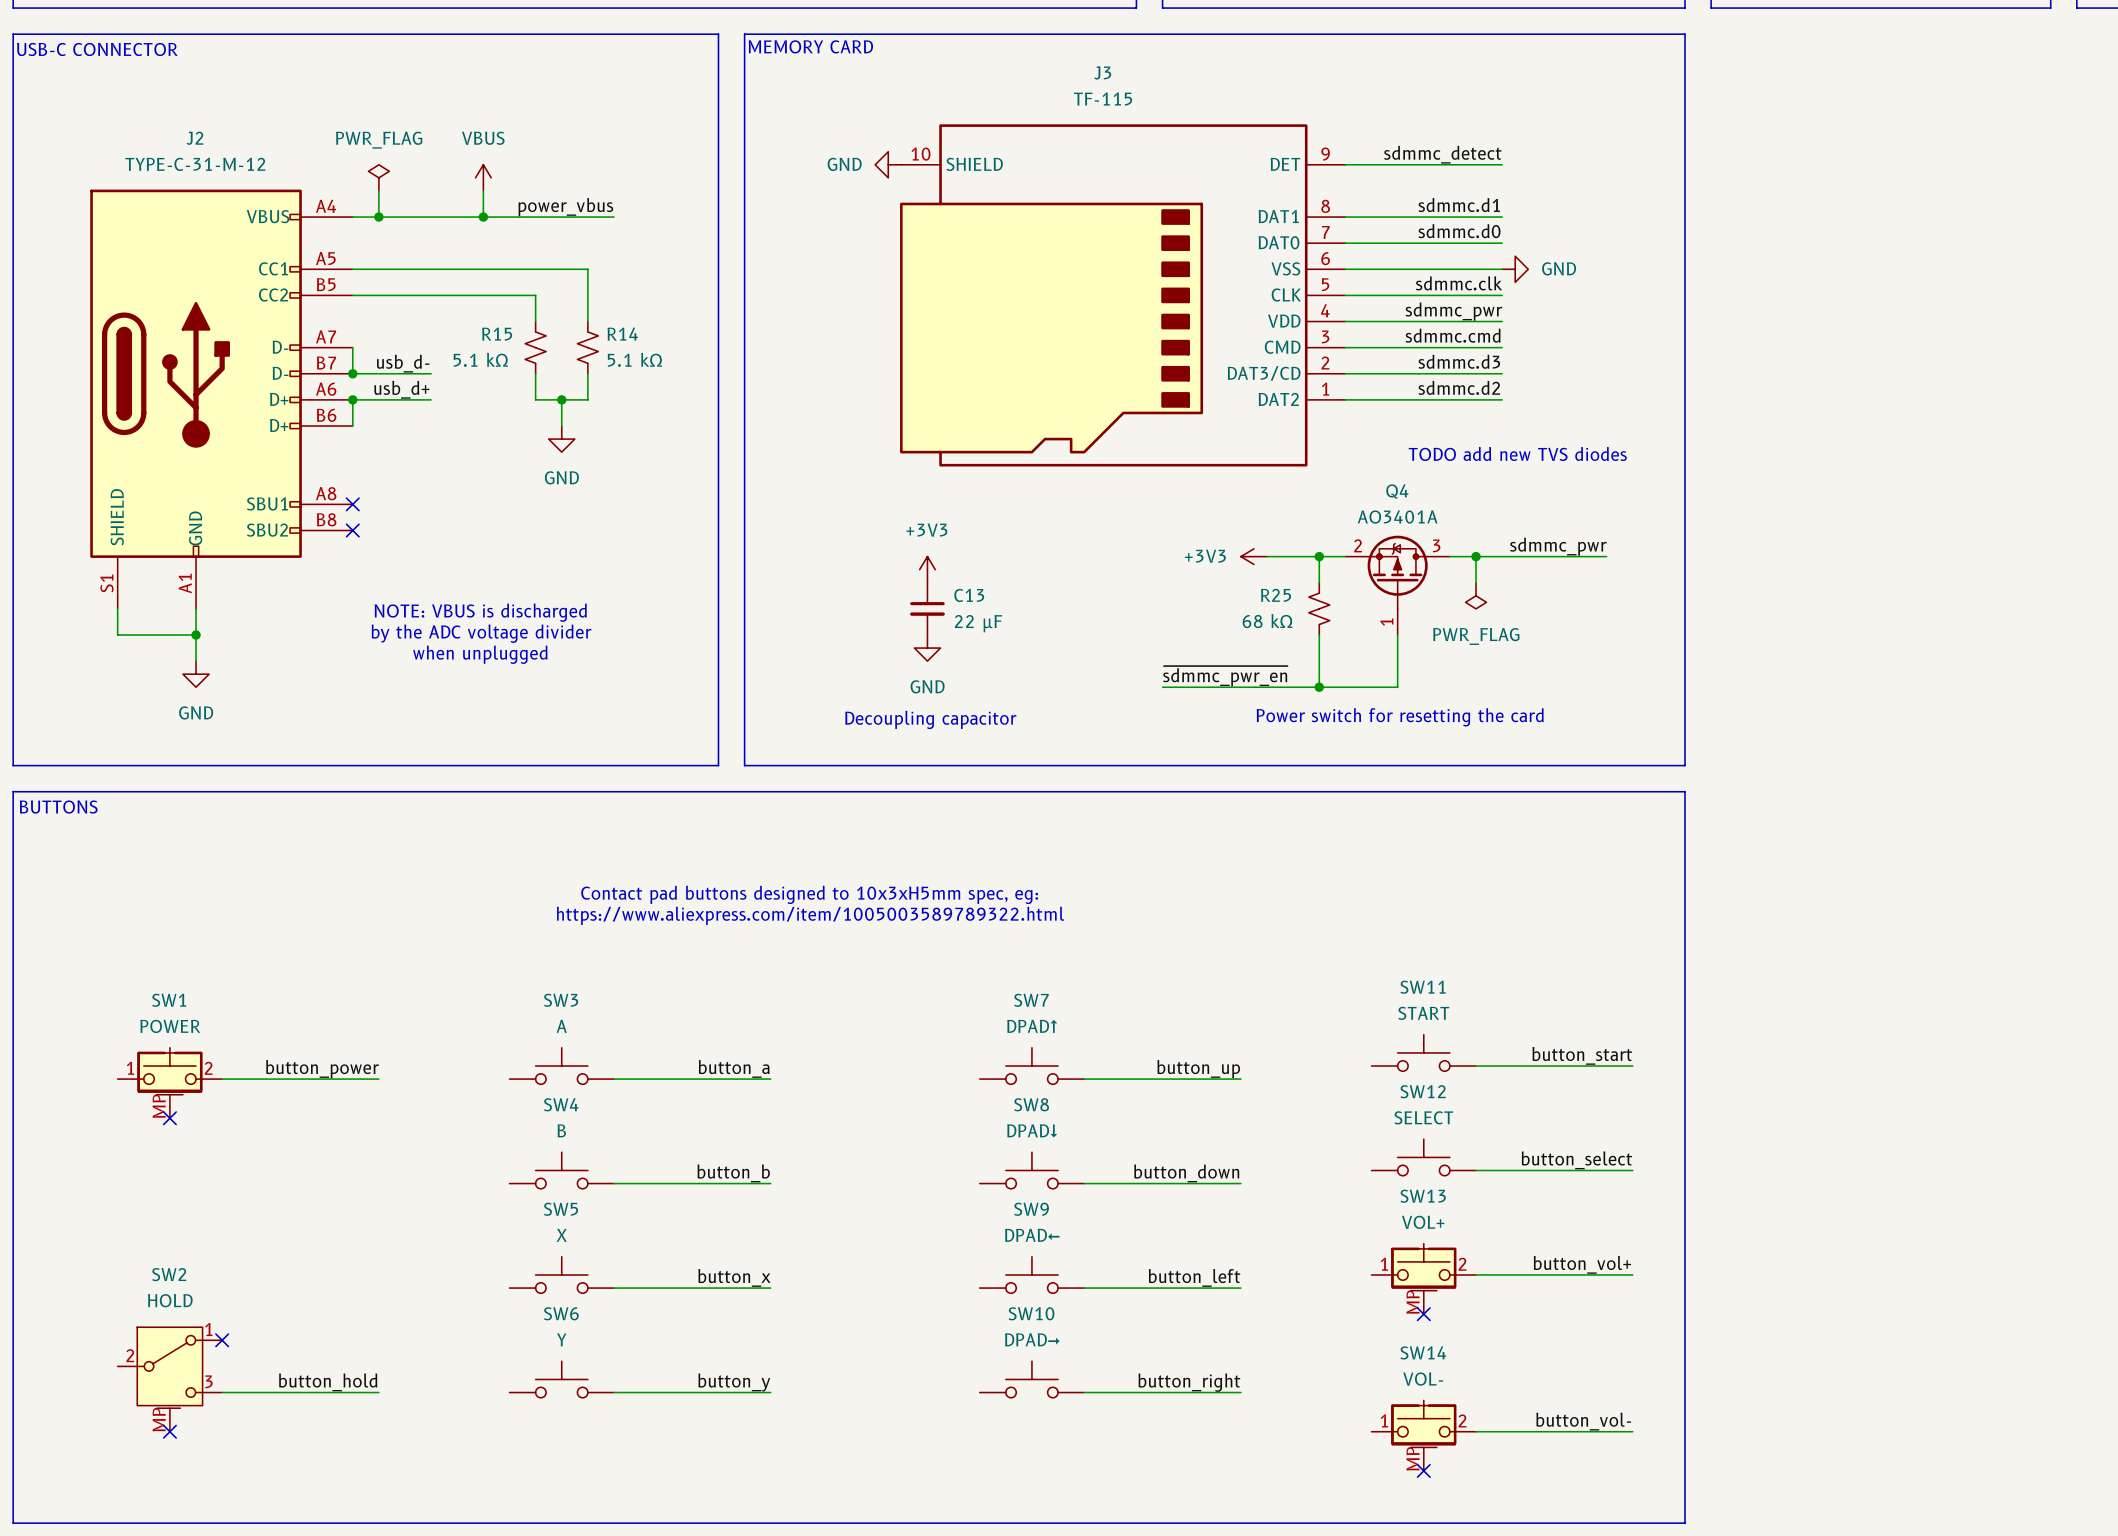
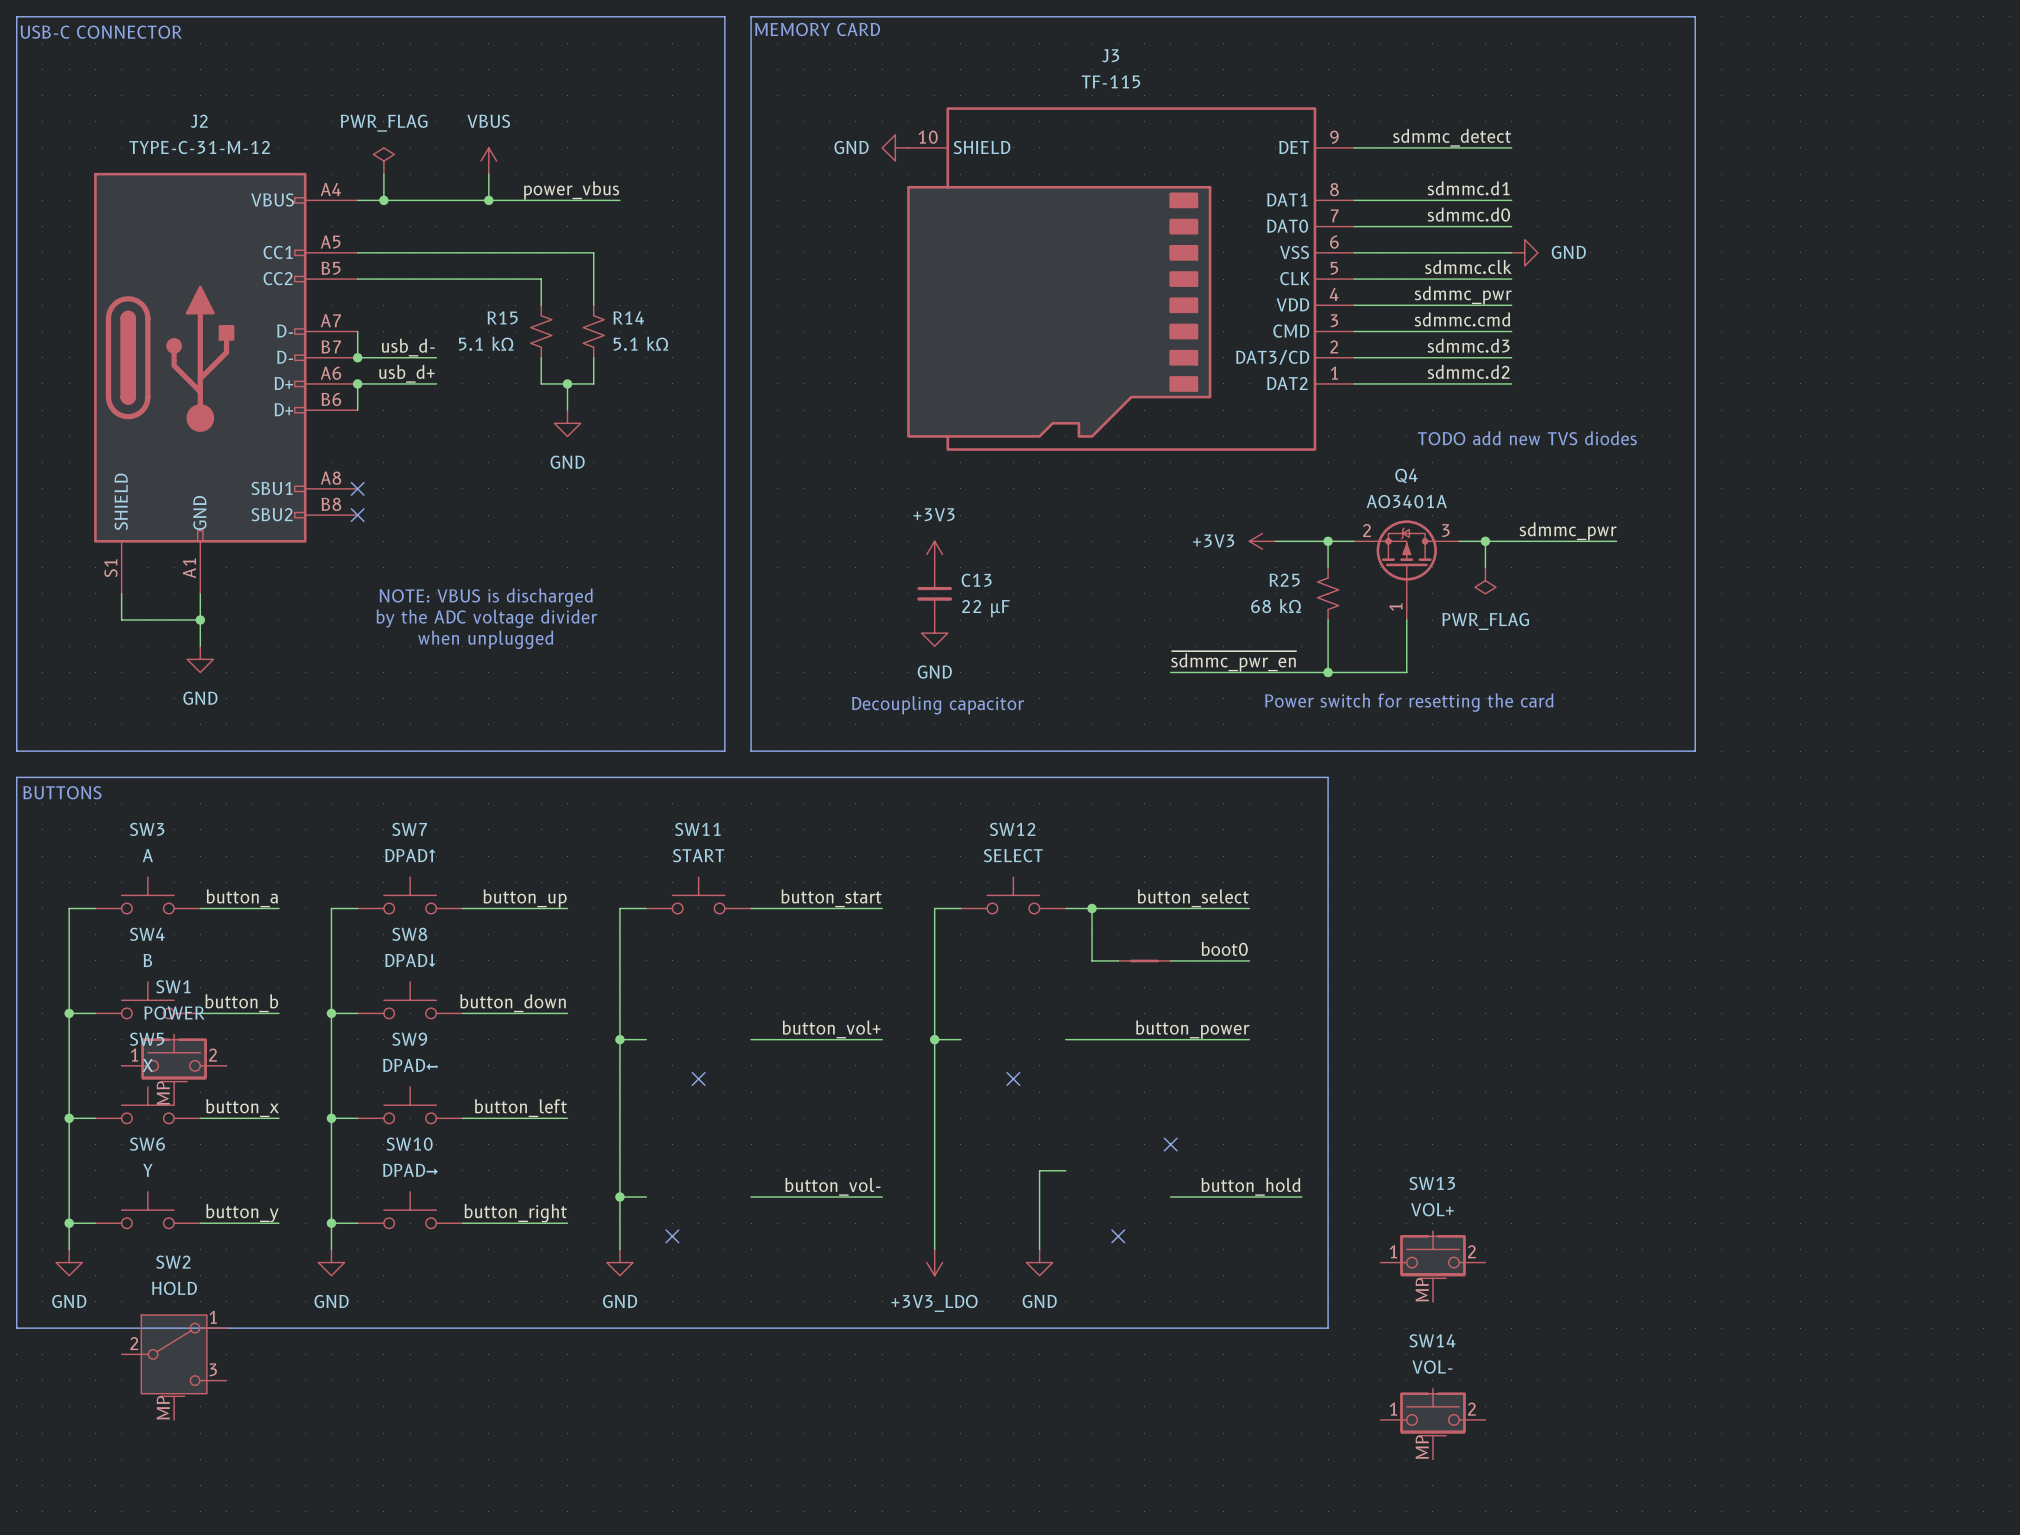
line: (1319, 791) (1685, 791) (1685, 1523) (13, 1523) (13, 1340) -> (1328, 777) (1328, 1328) (16, 1328)
text: Contact pad buttons designed to 10x3xH5mm spec, eg: (809, 894) -> none
label: none -> button_a (242, 898)
label: none -> button_up (525, 898)
label: none -> button_start (831, 898)
label: none -> button_select (1193, 898)
text: https://www.aliexpress.com/item/1005003589789322.html (810, 915) -> none
wire: none -> (95, 908) (69, 908) (69, 1249)
wire: none -> (200, 908) (278, 908)
wire: none -> (357, 908) (331, 908) (331, 1249)
wire: none -> (462, 908) (567, 908)
wire: none -> (646, 908) (619, 908) (619, 1249)
wire: none -> (751, 908) (882, 908)
wire: none -> (960, 908) (934, 908) (934, 1249)
wire: none -> (1065, 908) (1249, 908)
wire: none -> (1092, 908) (1092, 960) (1118, 960)
junction: none -> (1092, 908)
label: none -> boot0 (1224, 948)
part: none -> (1144, 960)
wire: none -> (1170, 960) (1249, 960)
label: none -> button_b (241, 1003)
label: none -> button_down (513, 1003)
wire: none -> (69, 1013) (95, 1013)
junction: none -> (69, 1013)
wire: none -> (200, 1013) (278, 1013)
wire: none -> (331, 1013) (357, 1013)
junction: none -> (331, 1013)
wire: none -> (462, 1013) (567, 1013)
wire: none -> (619, 1039) (646, 1039)
junction: none -> (619, 1039)
wire: none -> (751, 1039) (882, 1039)
wire: none -> (934, 1039) (960, 1039)
junction: none -> (934, 1039)
wire: none -> (1065, 1039) (1249, 1039)
SW11 position: (1423, 1052) -> (698, 895)
label: button_start (1582, 1055) -> none
SW3 position: (561, 1066) -> (147, 895)
SW7 position: (1031, 1066) -> (410, 895)
wire: (1476, 1066) (1632, 1066) -> none
label: button_a (734, 1068) -> button_vol+ (831, 1029)
label: button_power (322, 1069) -> none
label: button_up (1198, 1069) -> button_power (1192, 1029)
wire: (222, 1079) (378, 1079) -> none
wire: (613, 1079) (770, 1079) -> none
wire: (1084, 1079) (1240, 1079) -> none
no-connect mark: none -> (698, 1078)
no-connect mark: none -> (1013, 1078)
no-connect mark: (169, 1118) -> none
label: none -> button_x (242, 1108)
label: none -> button_left (520, 1108)
wire: none -> (69, 1118) (95, 1118)
junction: none -> (69, 1118)
wire: none -> (200, 1118) (278, 1118)
wire: none -> (331, 1118) (357, 1118)
junction: none -> (331, 1118)
wire: none -> (462, 1118) (567, 1118)
no-connect mark: none -> (1170, 1144)
SW12 position: (1423, 1157) -> (1013, 895)
label: button_select (1576, 1160) -> none
SW4 position: (561, 1170) -> (147, 1000)
SW8 position: (1031, 1170) -> (410, 1000)
wire: (1476, 1170) (1632, 1170) -> none
label: button_b (733, 1173) -> button_vol- (832, 1186)
label: button_down (1186, 1173) -> button_hold (1250, 1186)
wire: (613, 1183) (770, 1183) -> none
wire: none -> (1065, 1170) (1039, 1170) (1039, 1249)
wire: (1084, 1183) (1240, 1183) -> none
wire: none -> (619, 1197) (646, 1197)
junction: none -> (619, 1197)
wire: none -> (751, 1197) (882, 1197)
wire: none -> (1170, 1197) (1301, 1197)
label: none -> button_y (242, 1213)
label: none -> button_right (515, 1213)
wire: none -> (69, 1223) (95, 1223)
junction: none -> (69, 1223)
wire: none -> (200, 1223) (278, 1223)
wire: none -> (331, 1223) (357, 1223)
junction: none -> (331, 1223)
wire: none -> (462, 1223) (567, 1223)
no-connect mark: none -> (672, 1236)
no-connect mark: none -> (1118, 1236)
label: button_vol+ (1582, 1264) -> none
power symbol: none -> GND (69, 1262)
power symbol: none -> GND (331, 1262)
SW5 position: (561, 1274) -> (147, 1105)
power symbol: none -> GND (619, 1262)
power symbol: none -> +3V3_LDO (934, 1262)
SW9 position: (1031, 1274) -> (410, 1105)
power symbol: none -> GND (1039, 1262)
wire: (1476, 1274) (1632, 1274) -> none
label: button_x (734, 1277) -> none
label: button_left (1194, 1277) -> none
wire: (613, 1288) (770, 1288) -> none
wire: (1084, 1288) (1240, 1288) -> none
no-connect mark: (1423, 1314) -> none
no-connect mark: (222, 1340) -> none
SW6 position: (561, 1379) -> (147, 1210)
SW10 position: (1031, 1379) -> (410, 1210)
label: button_hold (328, 1382) -> none
label: button_y (734, 1382) -> none
label: button_right (1189, 1382) -> none
wire: (222, 1392) (378, 1392) -> none
wire: (613, 1392) (770, 1392) -> none
wire: (1084, 1392) (1240, 1392) -> none
label: button_vol- (1583, 1421) -> none
no-connect mark: (169, 1431) -> none
wire: (1476, 1431) (1632, 1431) -> none
no-connect mark: (1423, 1470) -> none

